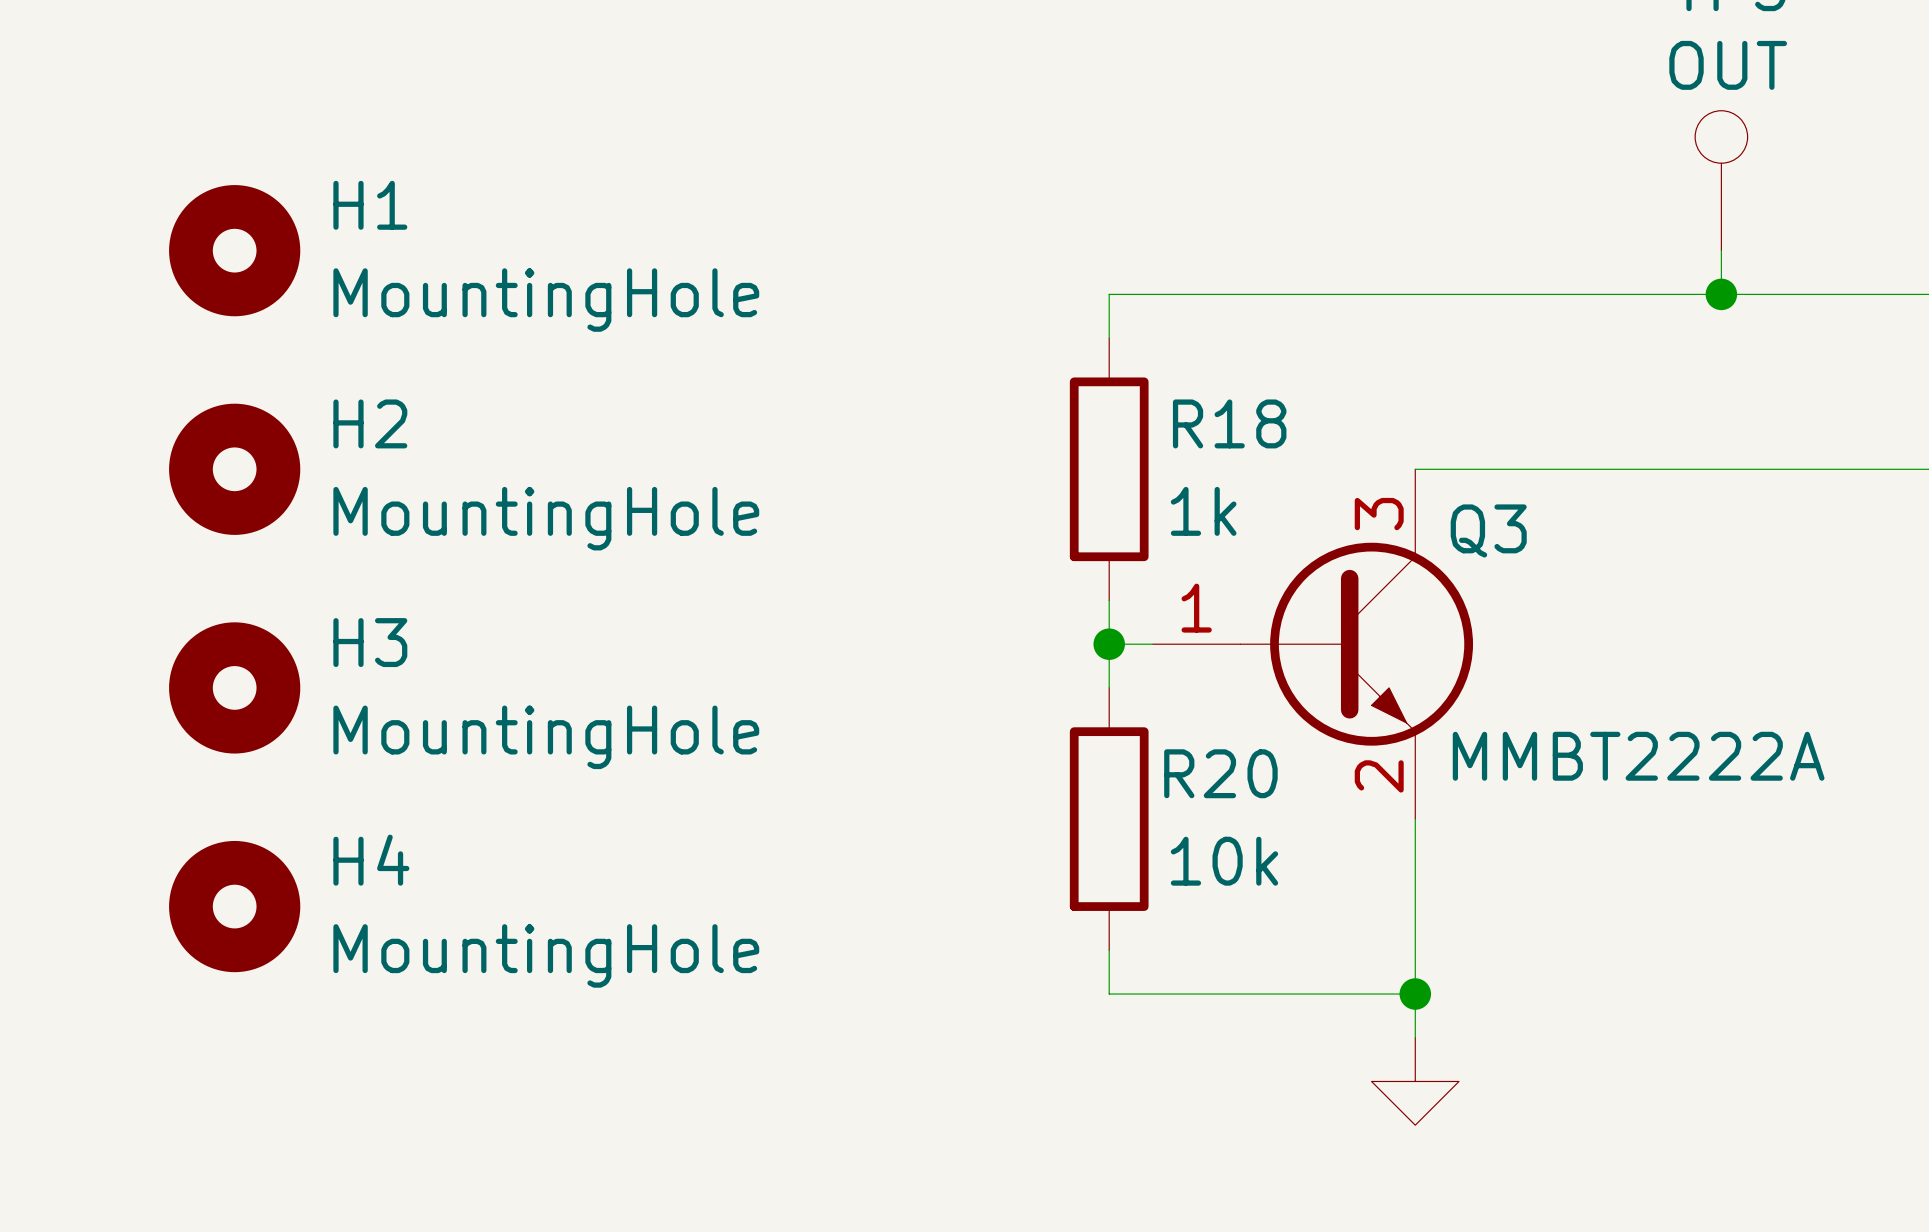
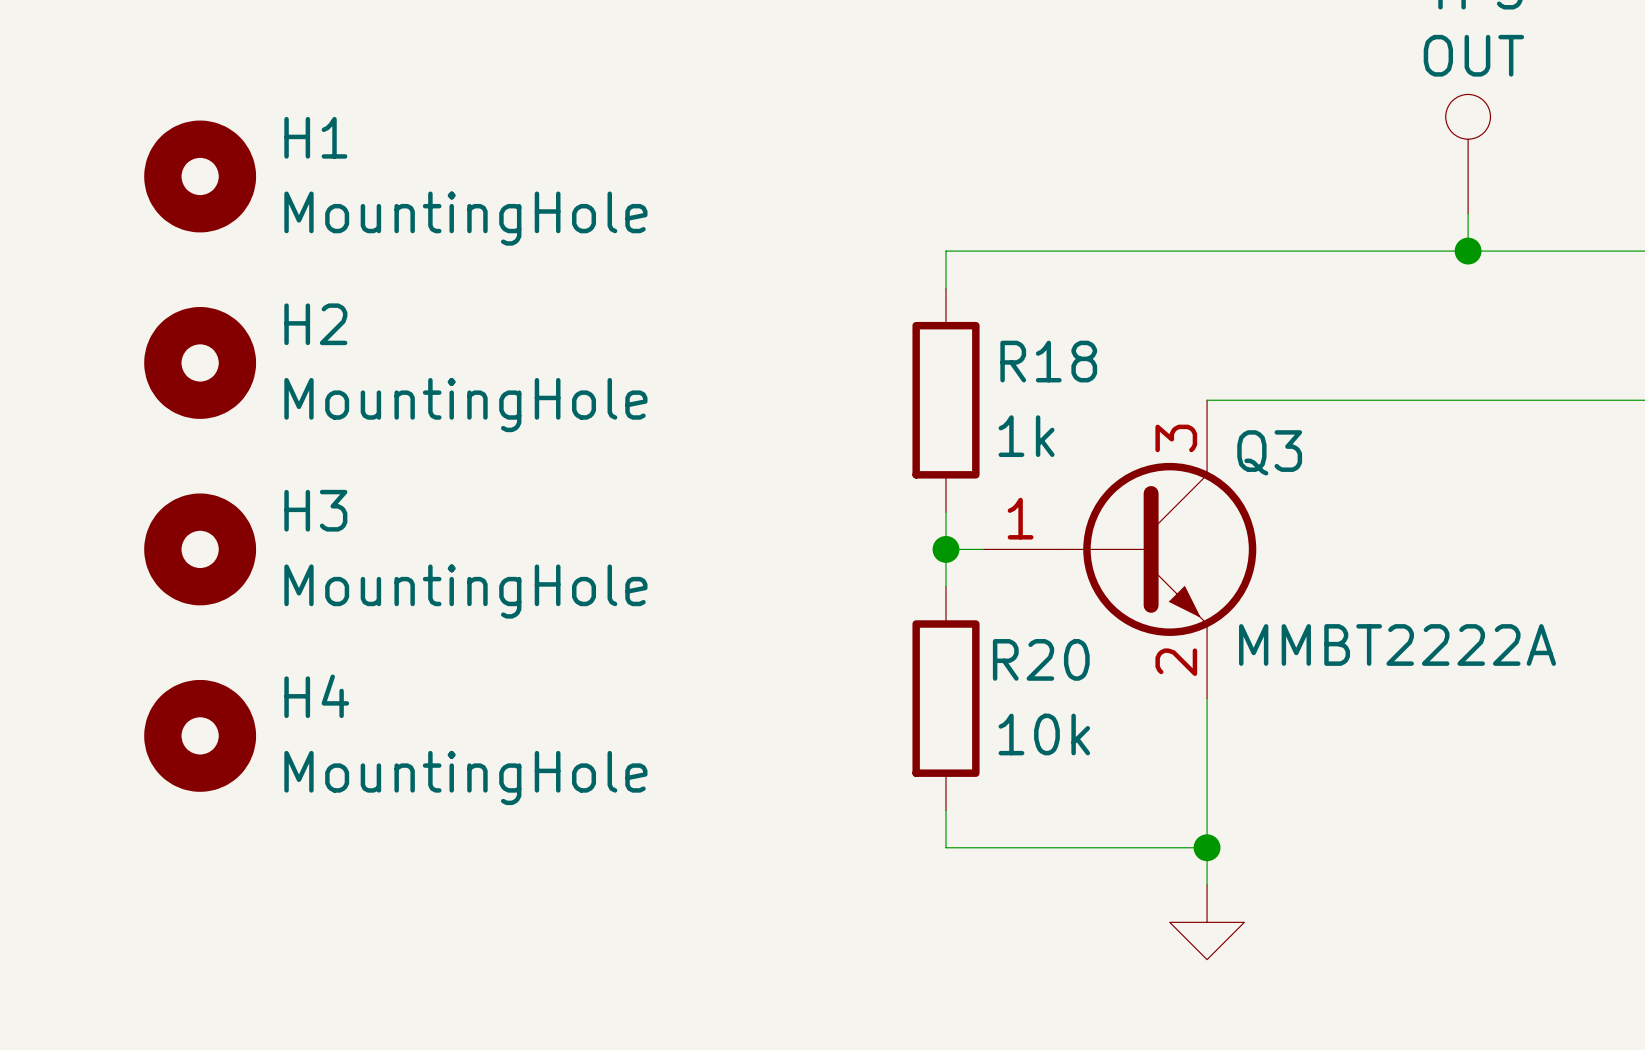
H1 position: (234, 250) -> (200, 176)
H2 position: (234, 469) -> (200, 362)
H3 position: (234, 687) -> (200, 549)
H4 position: (234, 906) -> (200, 735)

